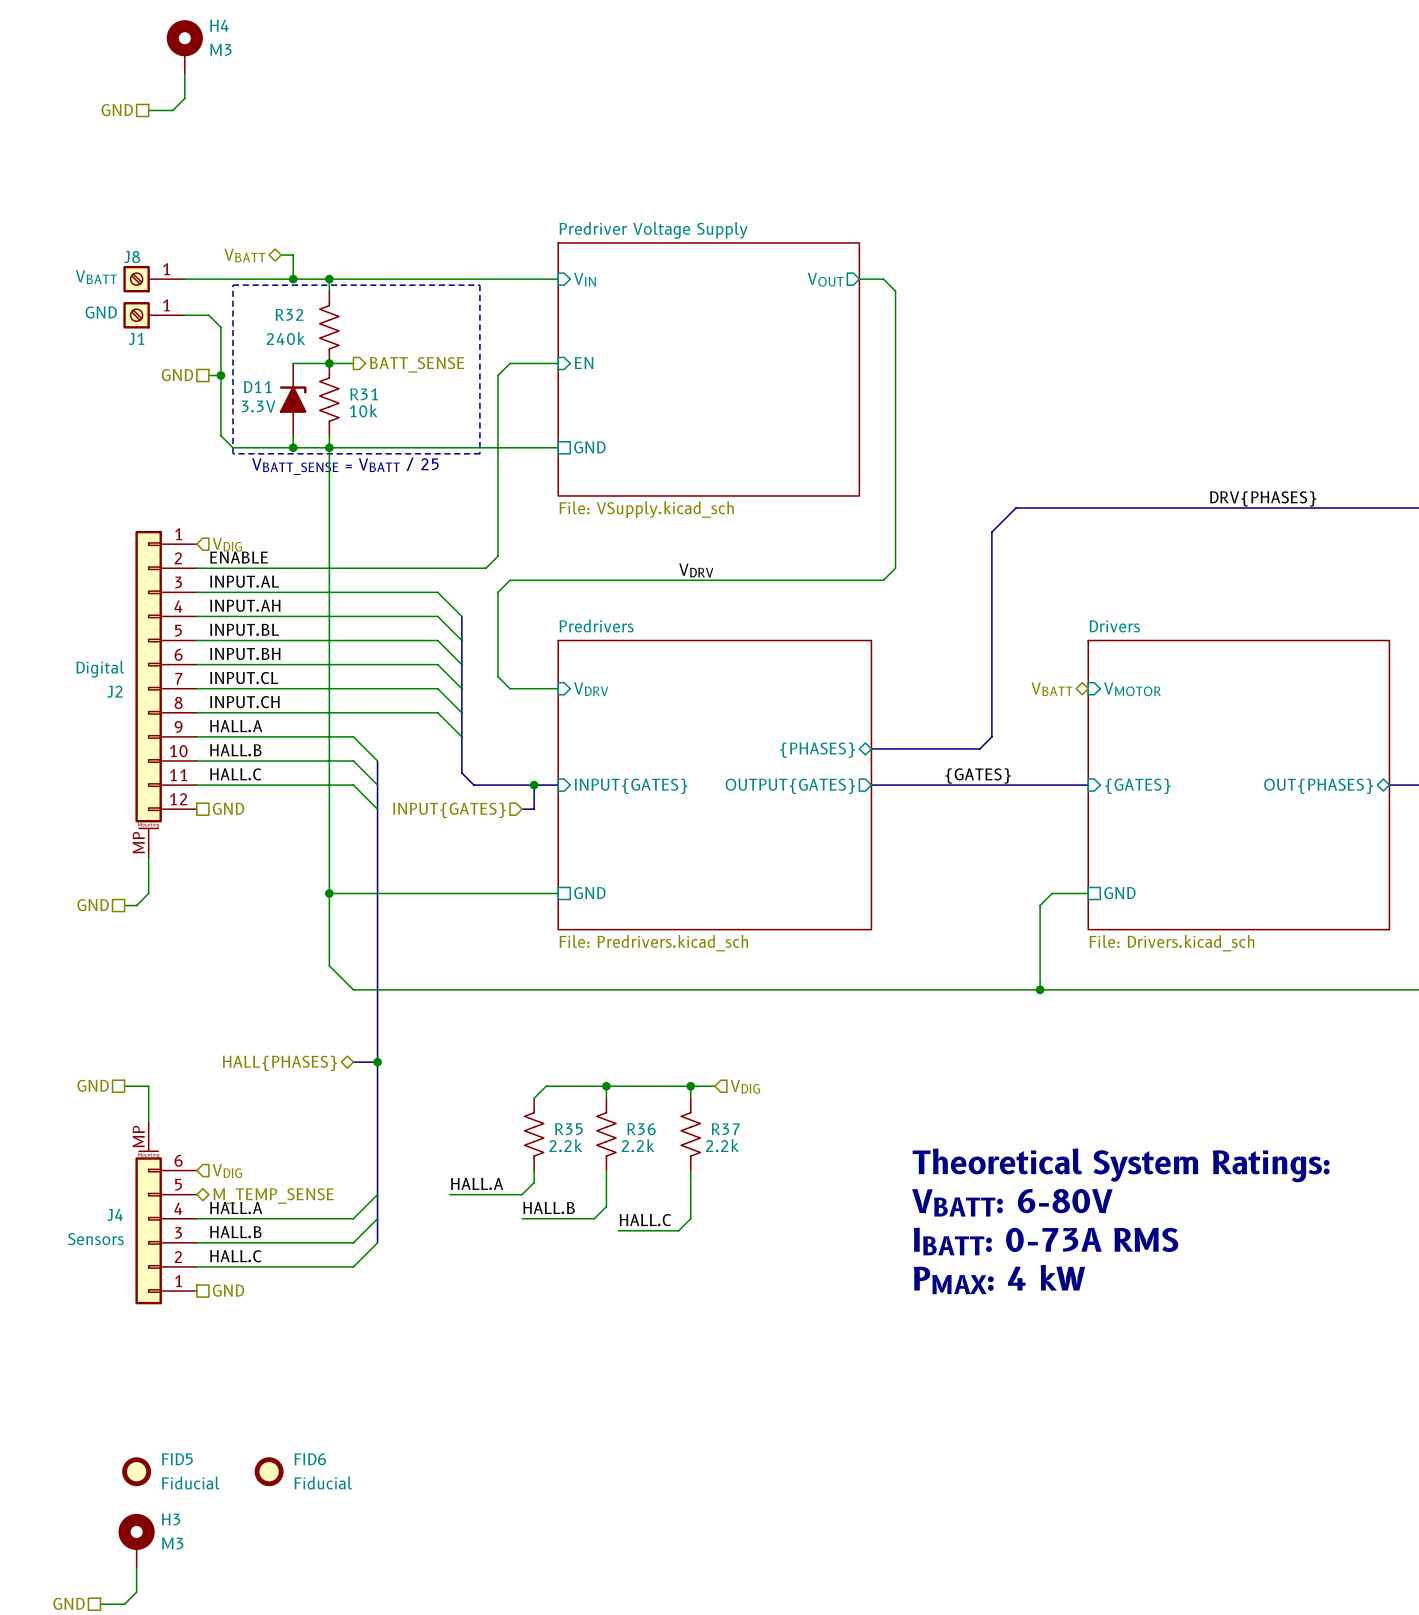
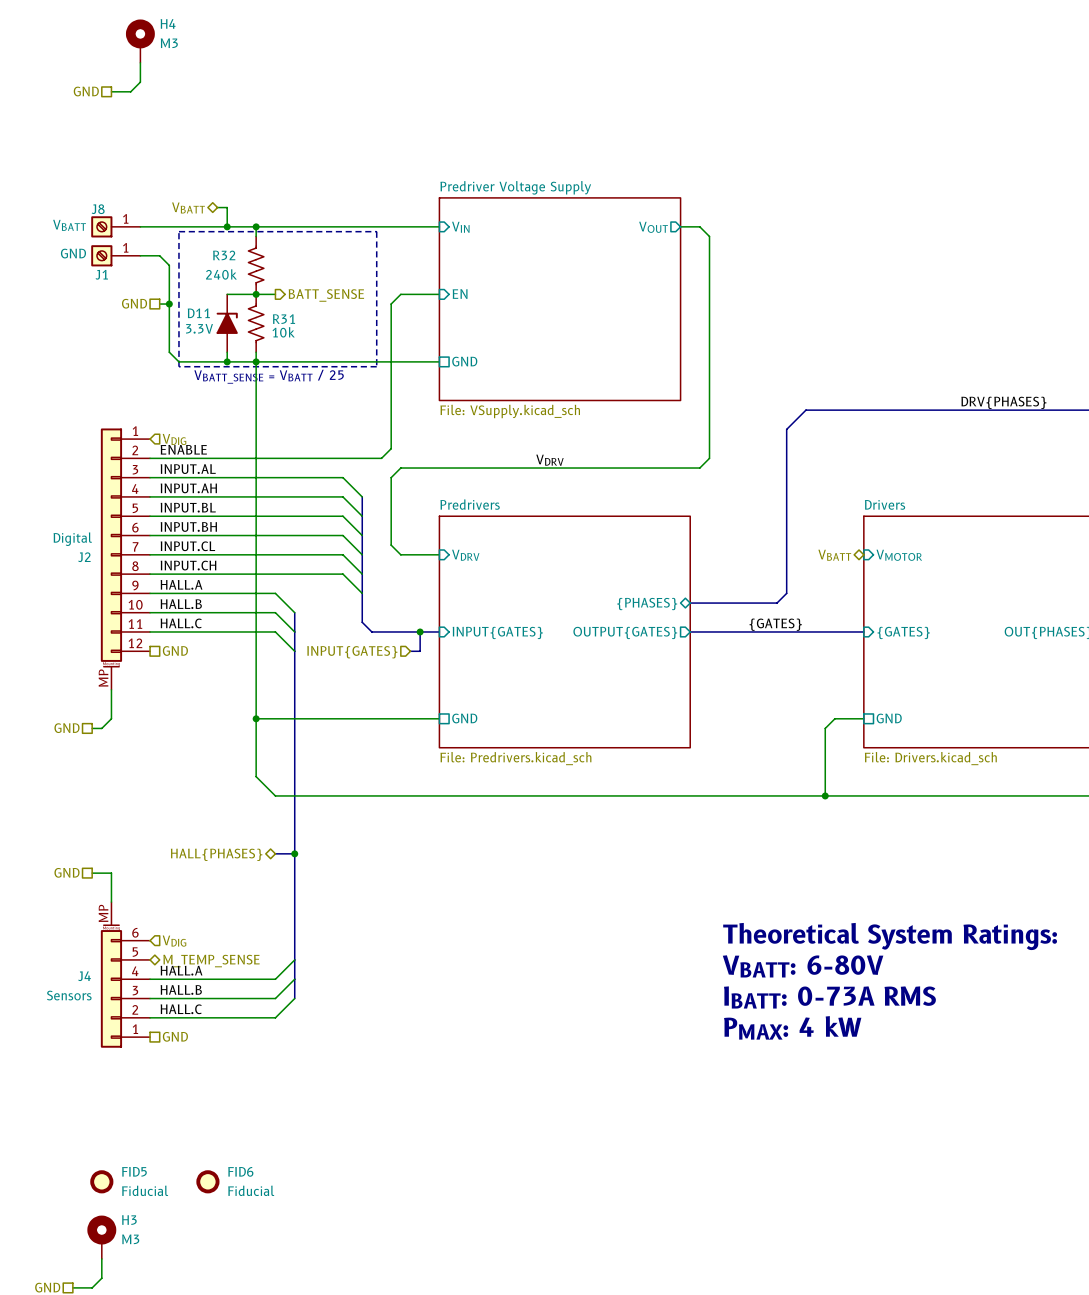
wire: (606, 1086) (606, 1098) -> none
junction: (606, 1086) -> none
wire: (690, 1086) (690, 1098) -> none
junction: (690, 1086) -> none
wire: (714, 1086) (546, 1086) (534, 1098) -> none
hierarchical label: VDIG (745, 1086) -> none
R35: 2.2k (534, 1134) -> none
R36: 2.2k (606, 1134) -> none
R37: 2.2k (690, 1134) -> none
wire: (534, 1170) (534, 1182) (522, 1194) (449, 1194) -> none
wire: (606, 1170) (606, 1206) (594, 1218) (522, 1218) -> none
wire: (690, 1170) (690, 1218) (678, 1230) (618, 1230) -> none
label: HALL.A (477, 1183) -> none
label: HALL.B (549, 1208) -> none
label: HALL.C (645, 1220) -> none

